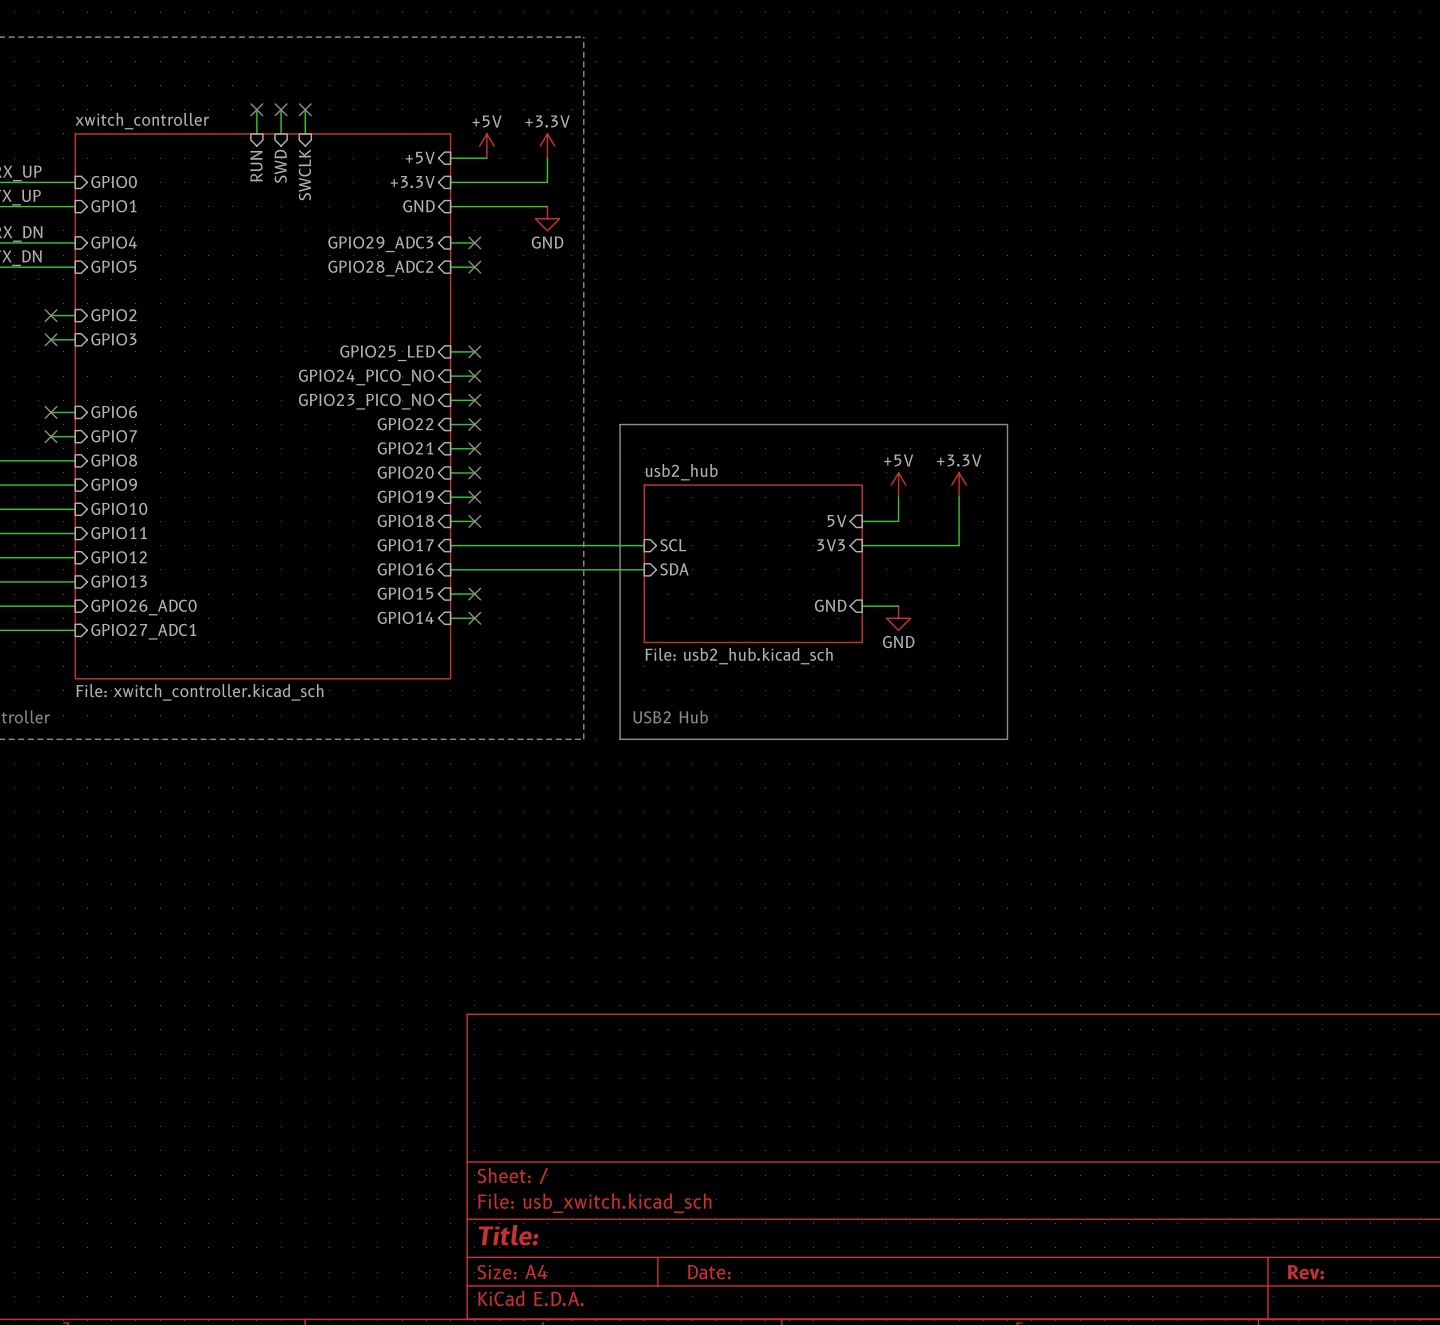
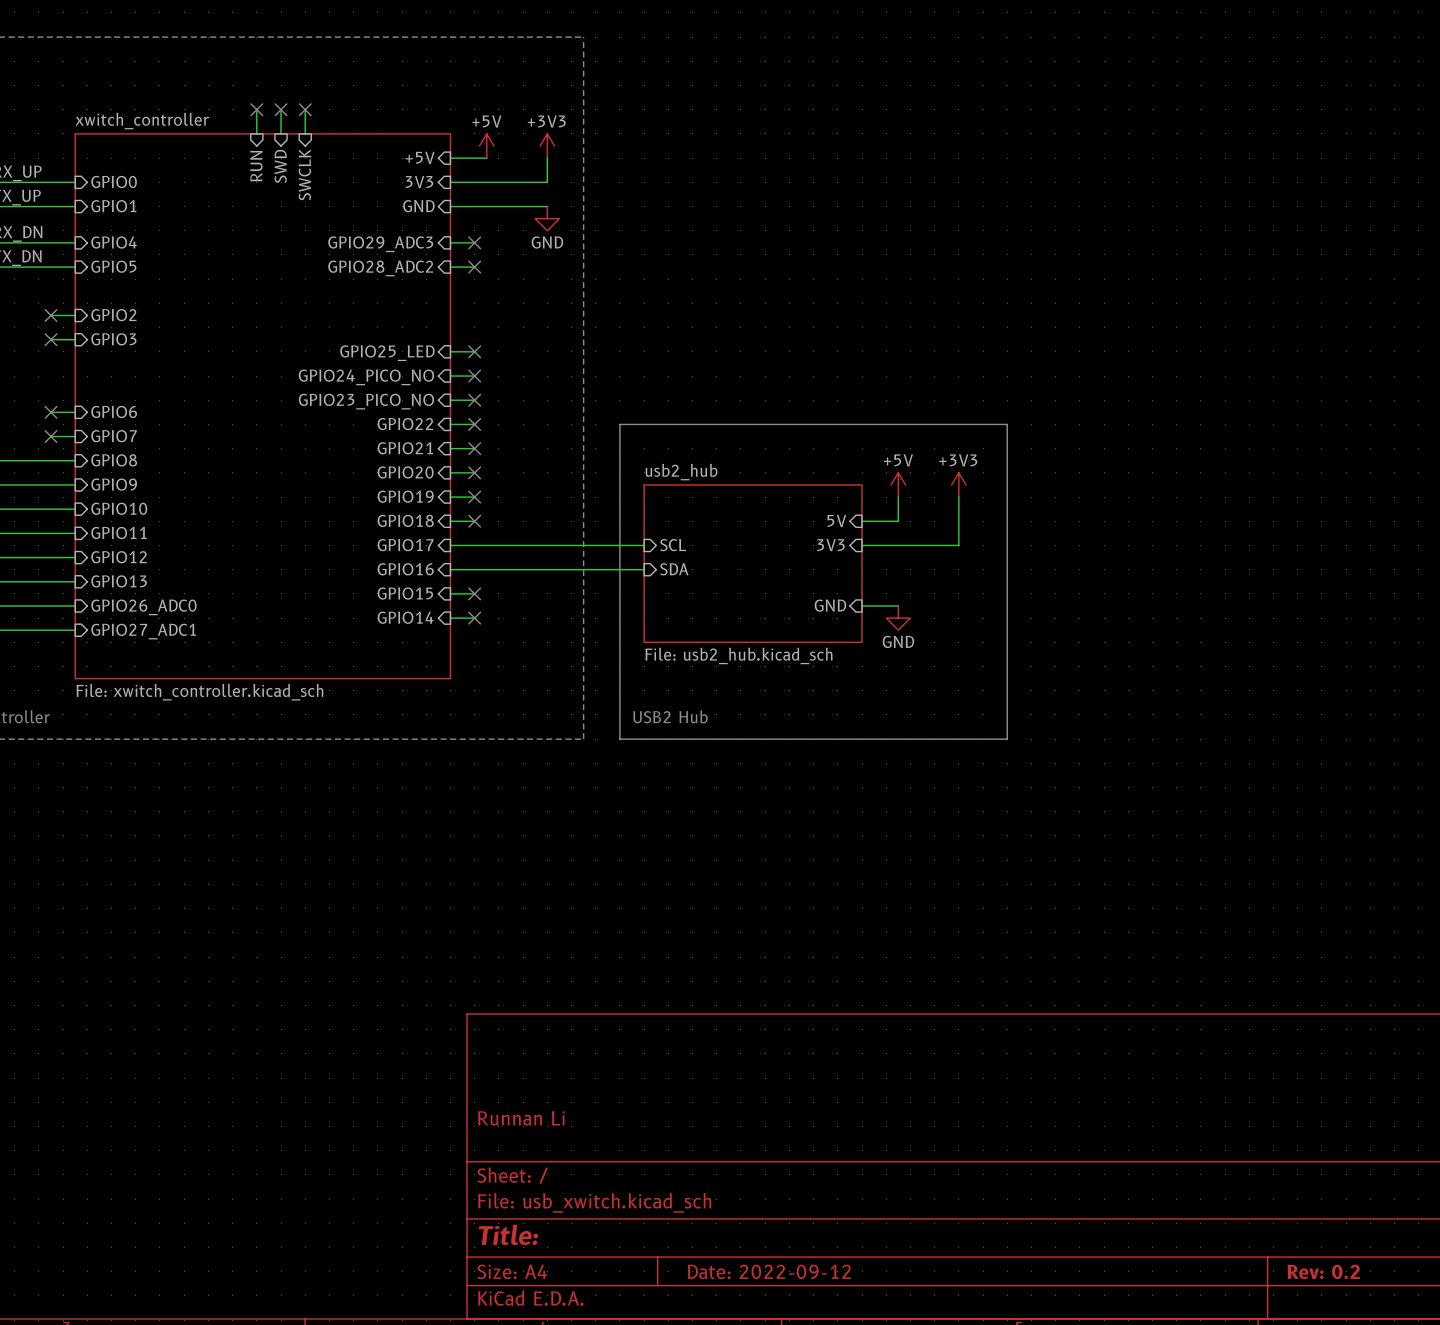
power symbol: +3.3V (547, 146) -> +3V3 (547, 146)
sheet pin: +3.3V (412, 182) -> 3V3 (419, 181)
power symbol: +3.3V (959, 485) -> +3V3 (958, 484)
title block: none -> Runnan Li (521, 1118)
title block: Date: (709, 1272) -> Date: 2022-09-12 (769, 1271)
title block: Rev: (1305, 1272) -> Rev: 0.2 (1323, 1271)

